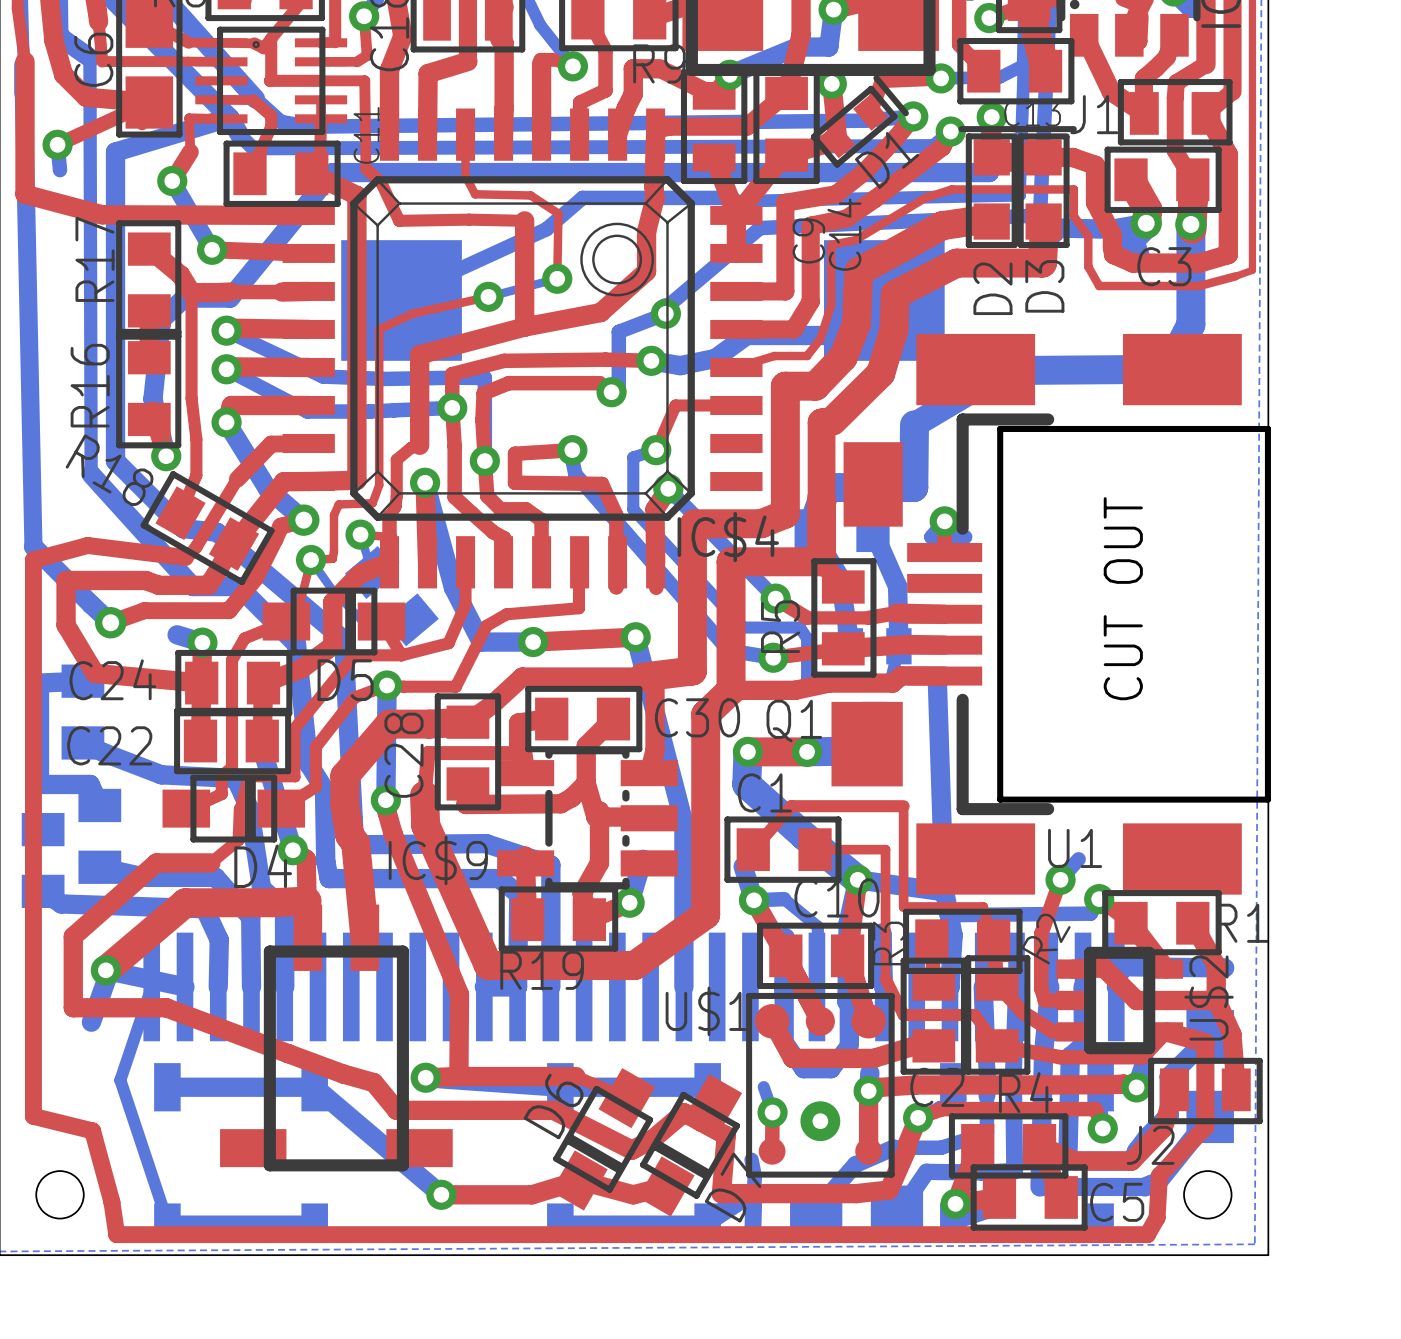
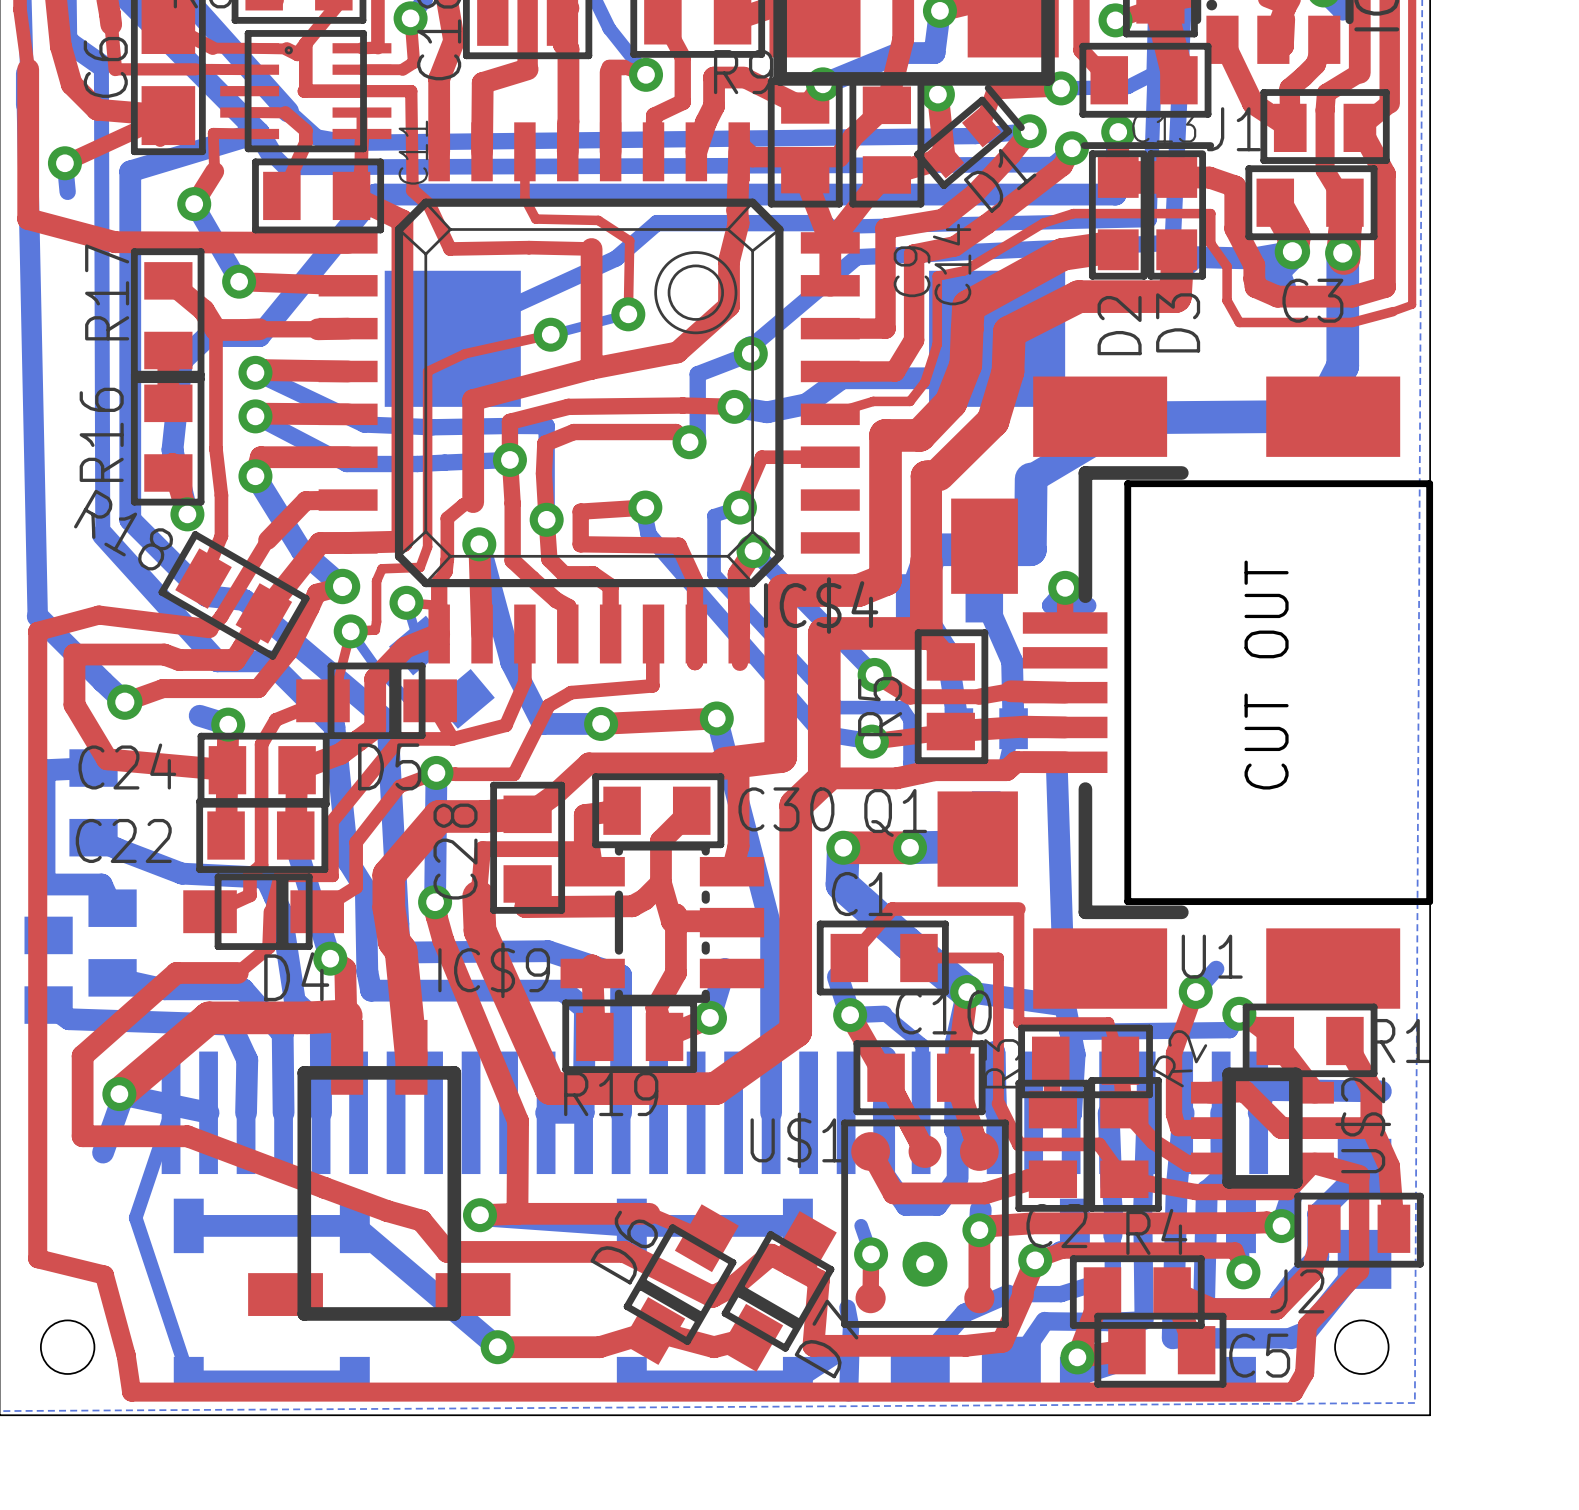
top track: (786, 93) (746, 126) (669, 126) (656, 129) -> (886, 105) (852, 137) (839, 157) (752, 157) (739, 146)

